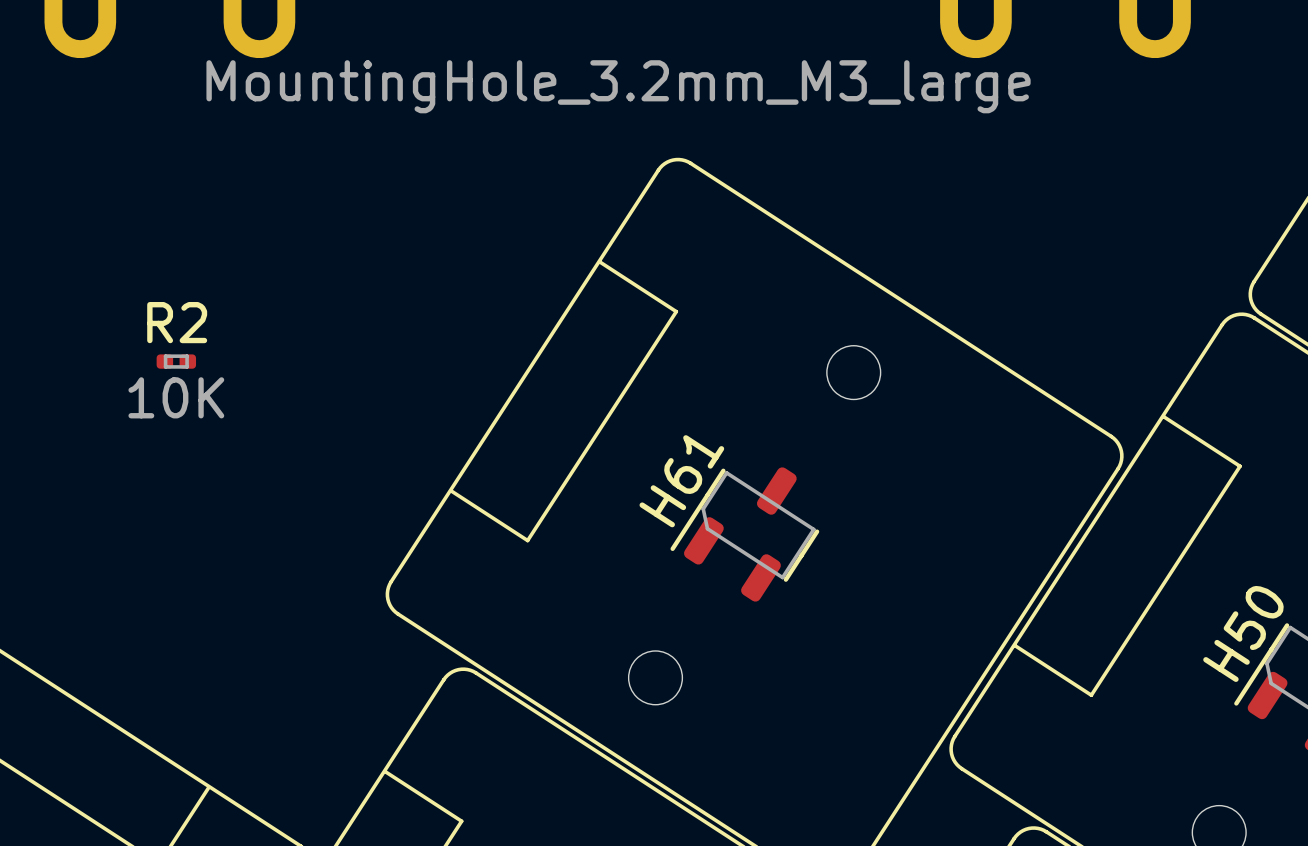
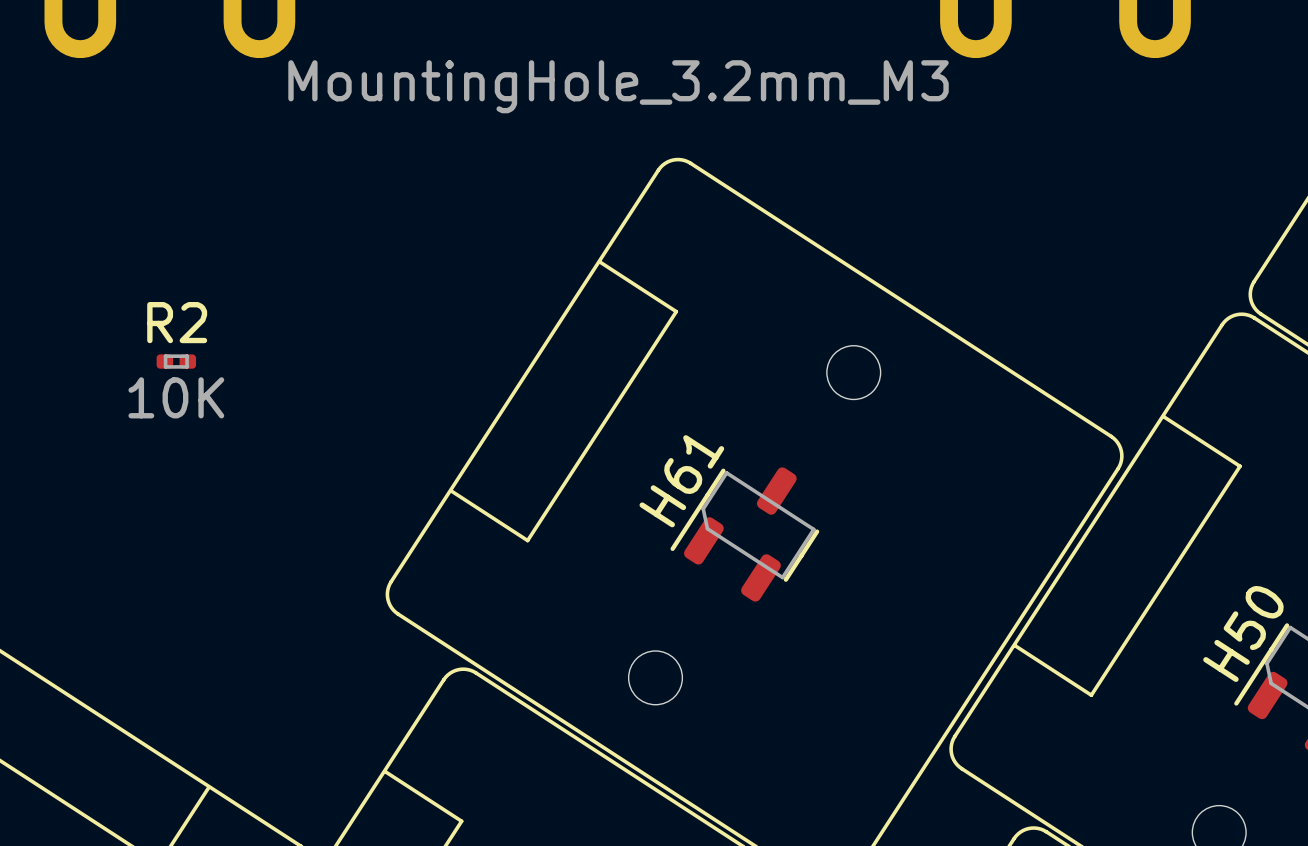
part value: MountingHole_3.2mm_M3_large (618, 86) -> MountingHole_3.2mm_M3 (618, 86)

